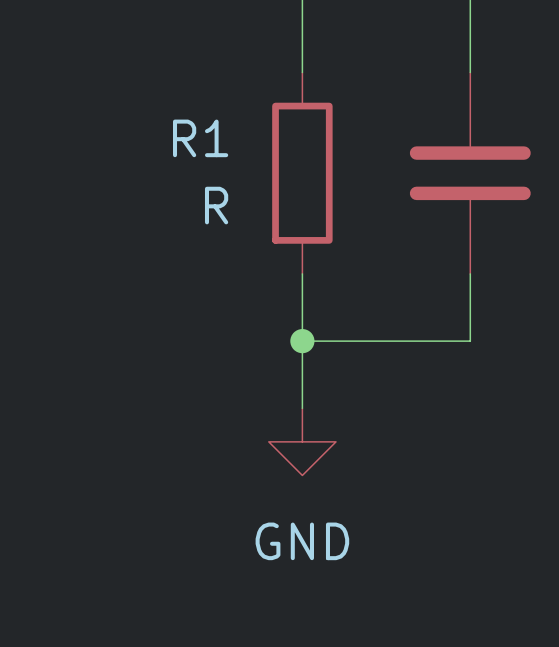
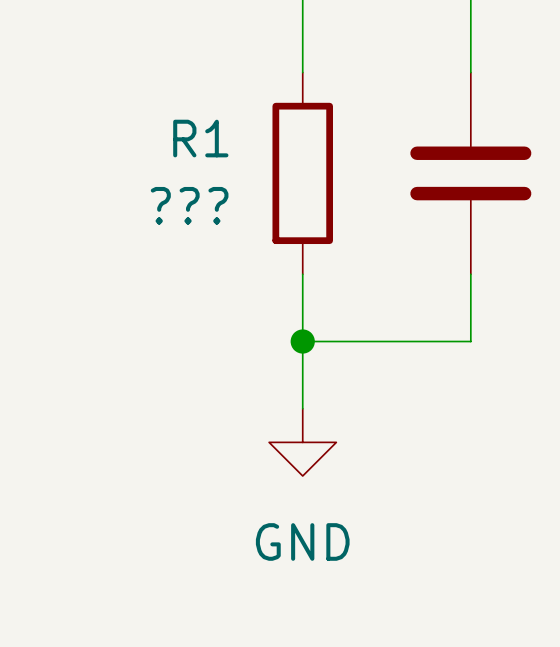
R1 value: R (216, 205) -> ??? (189, 205)

